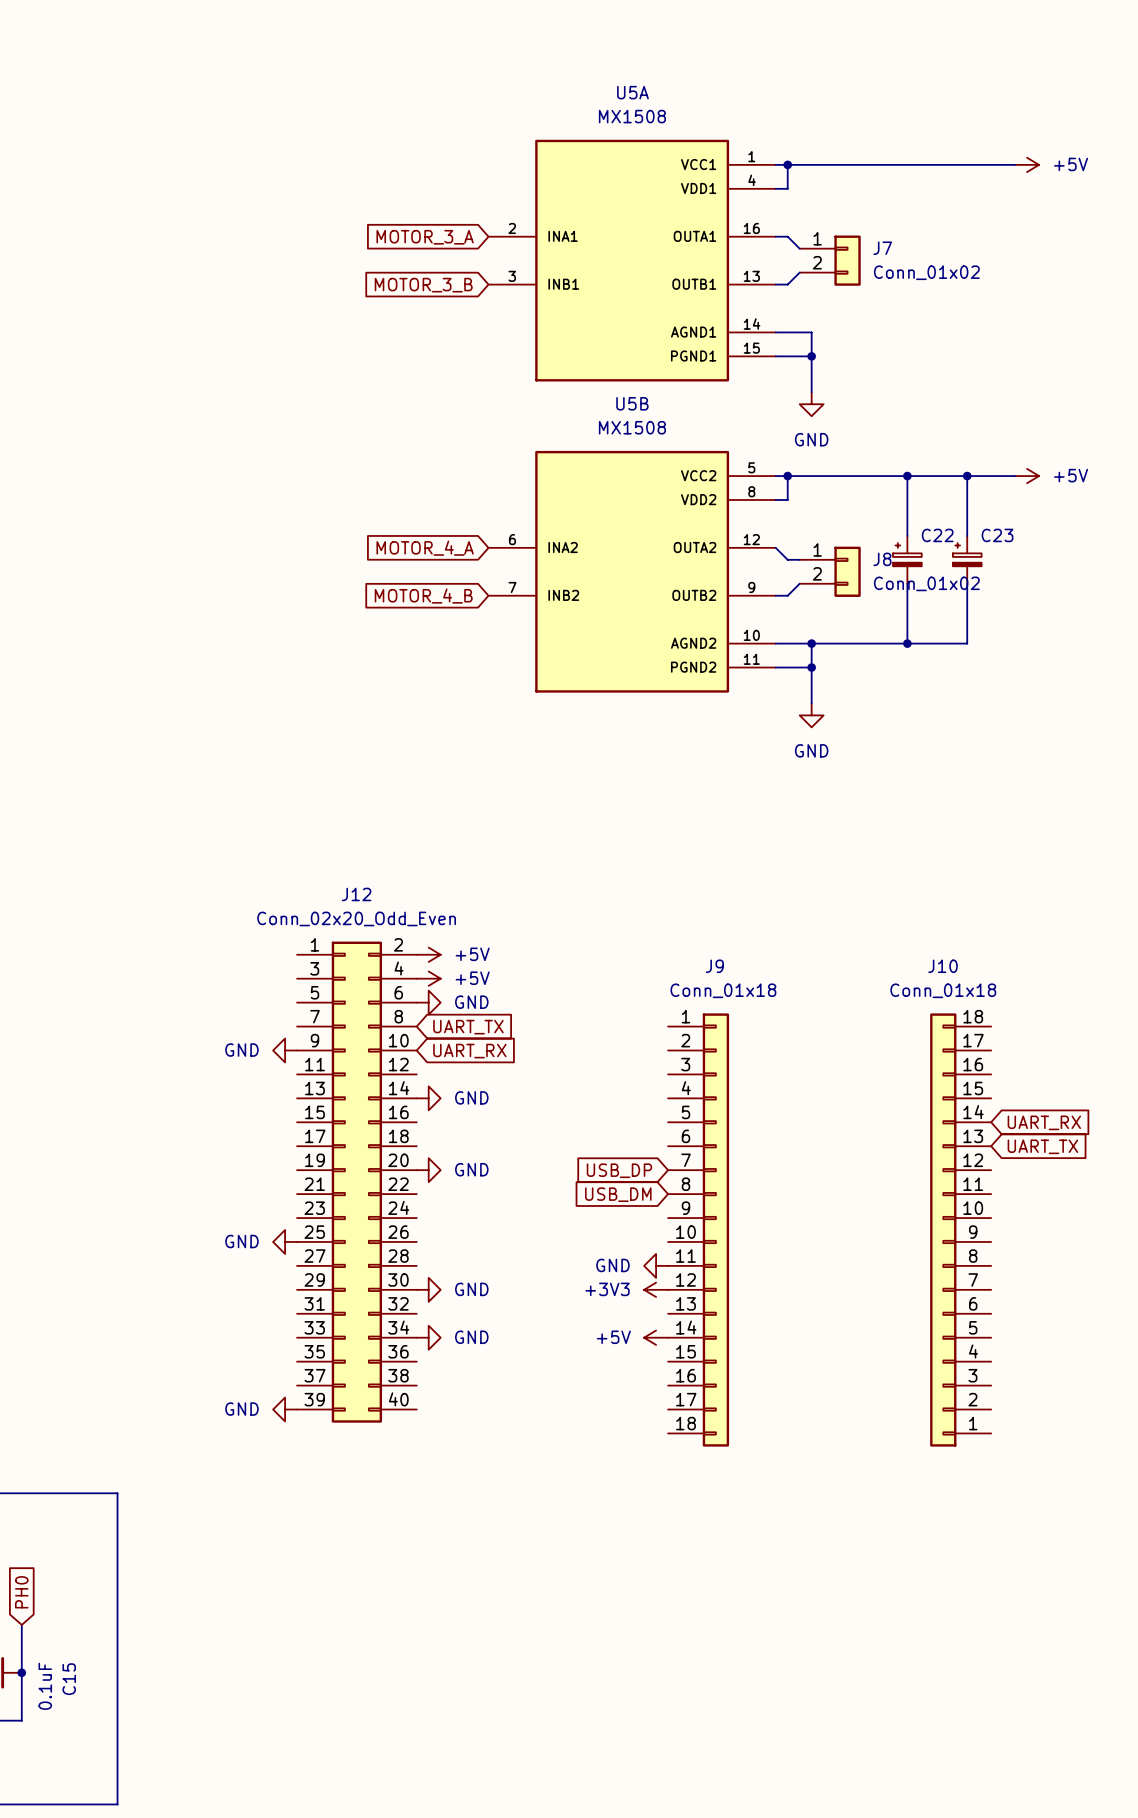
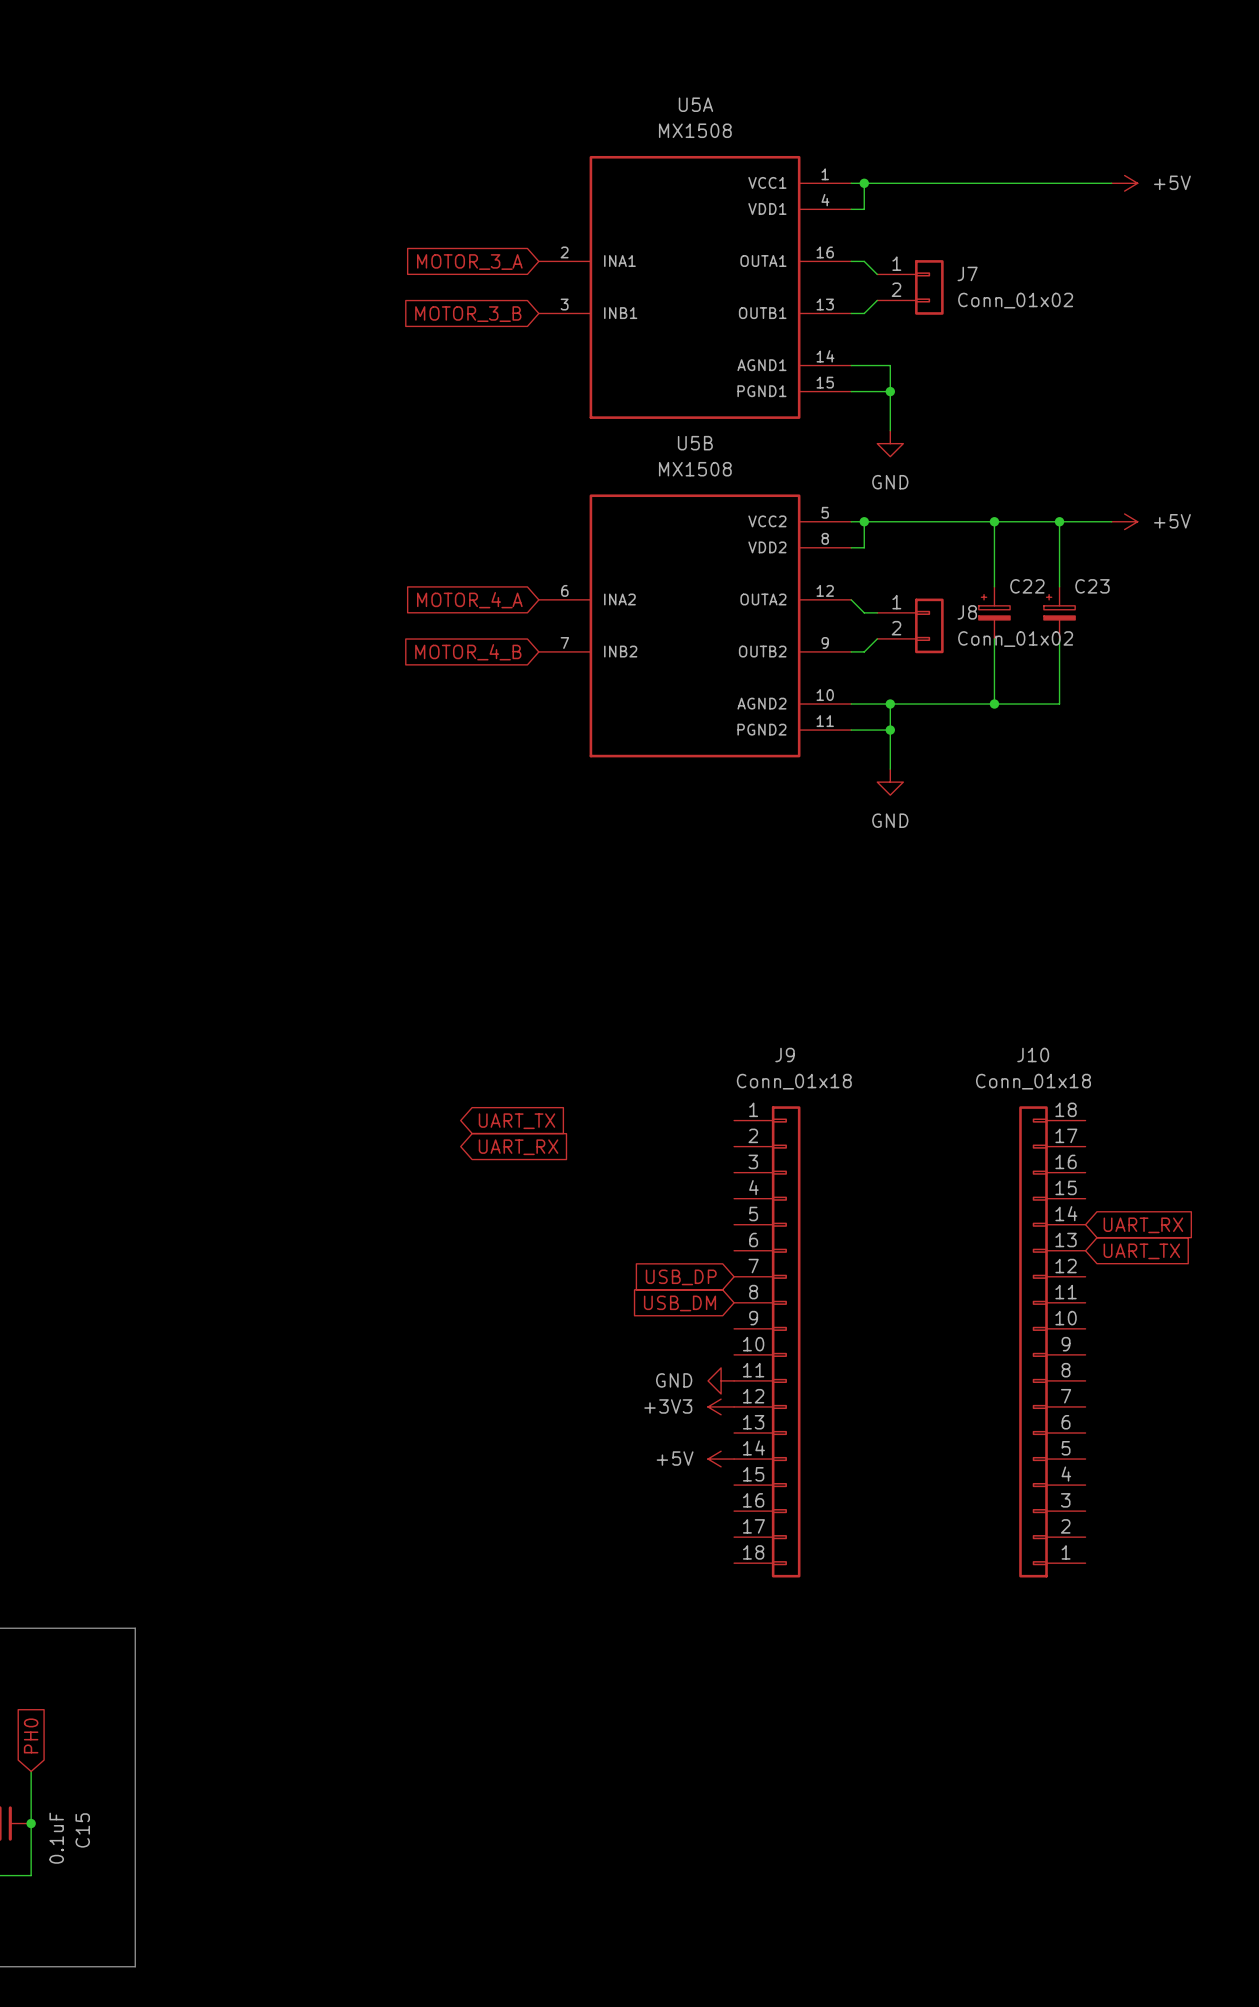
power symbol: +5V (428, 954) -> none
power symbol: +5V (428, 978) -> none
power symbol: GND (428, 1002) -> none
power symbol: GND (285, 1050) -> none
power symbol: GND (428, 1098) -> none
power symbol: GND (428, 1170) -> none
J12: Conn_02x20_Odd_Even (356, 1182) -> none
power symbol: GND (285, 1241) -> none
power symbol: GND (428, 1289) -> none
power symbol: GND (428, 1337) -> none
power symbol: GND (285, 1409) -> none

